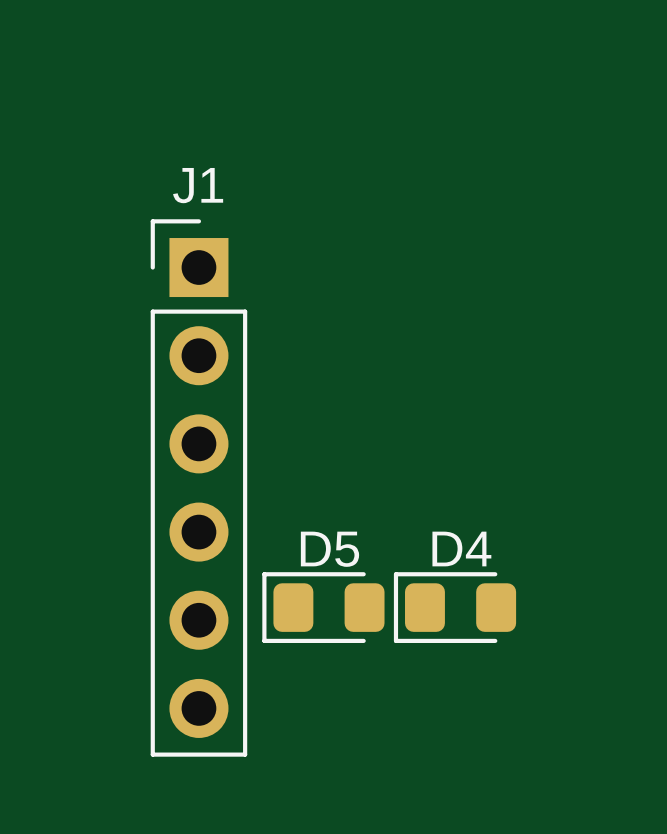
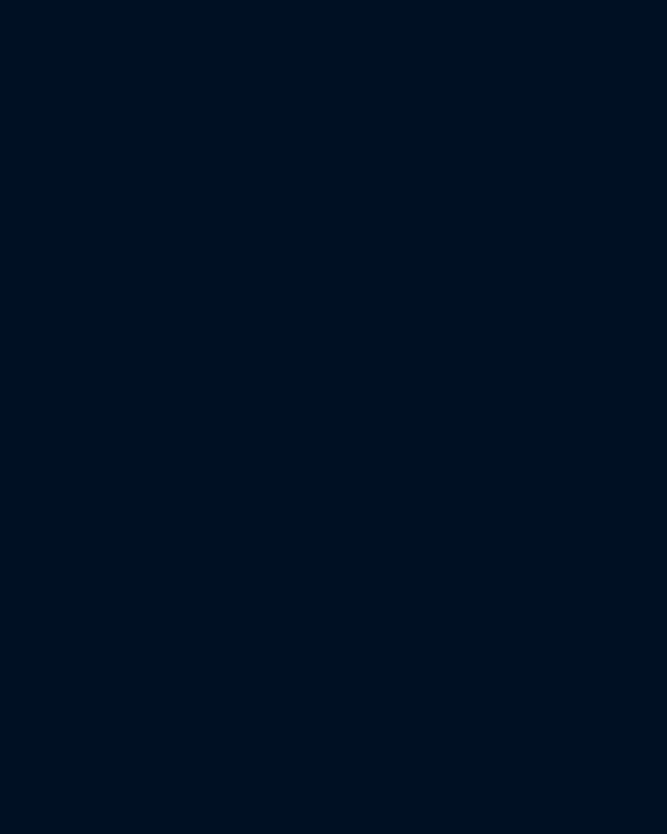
J1: (198, 487) -> none
D5: (323, 607) -> none
D4: (455, 607) -> none

